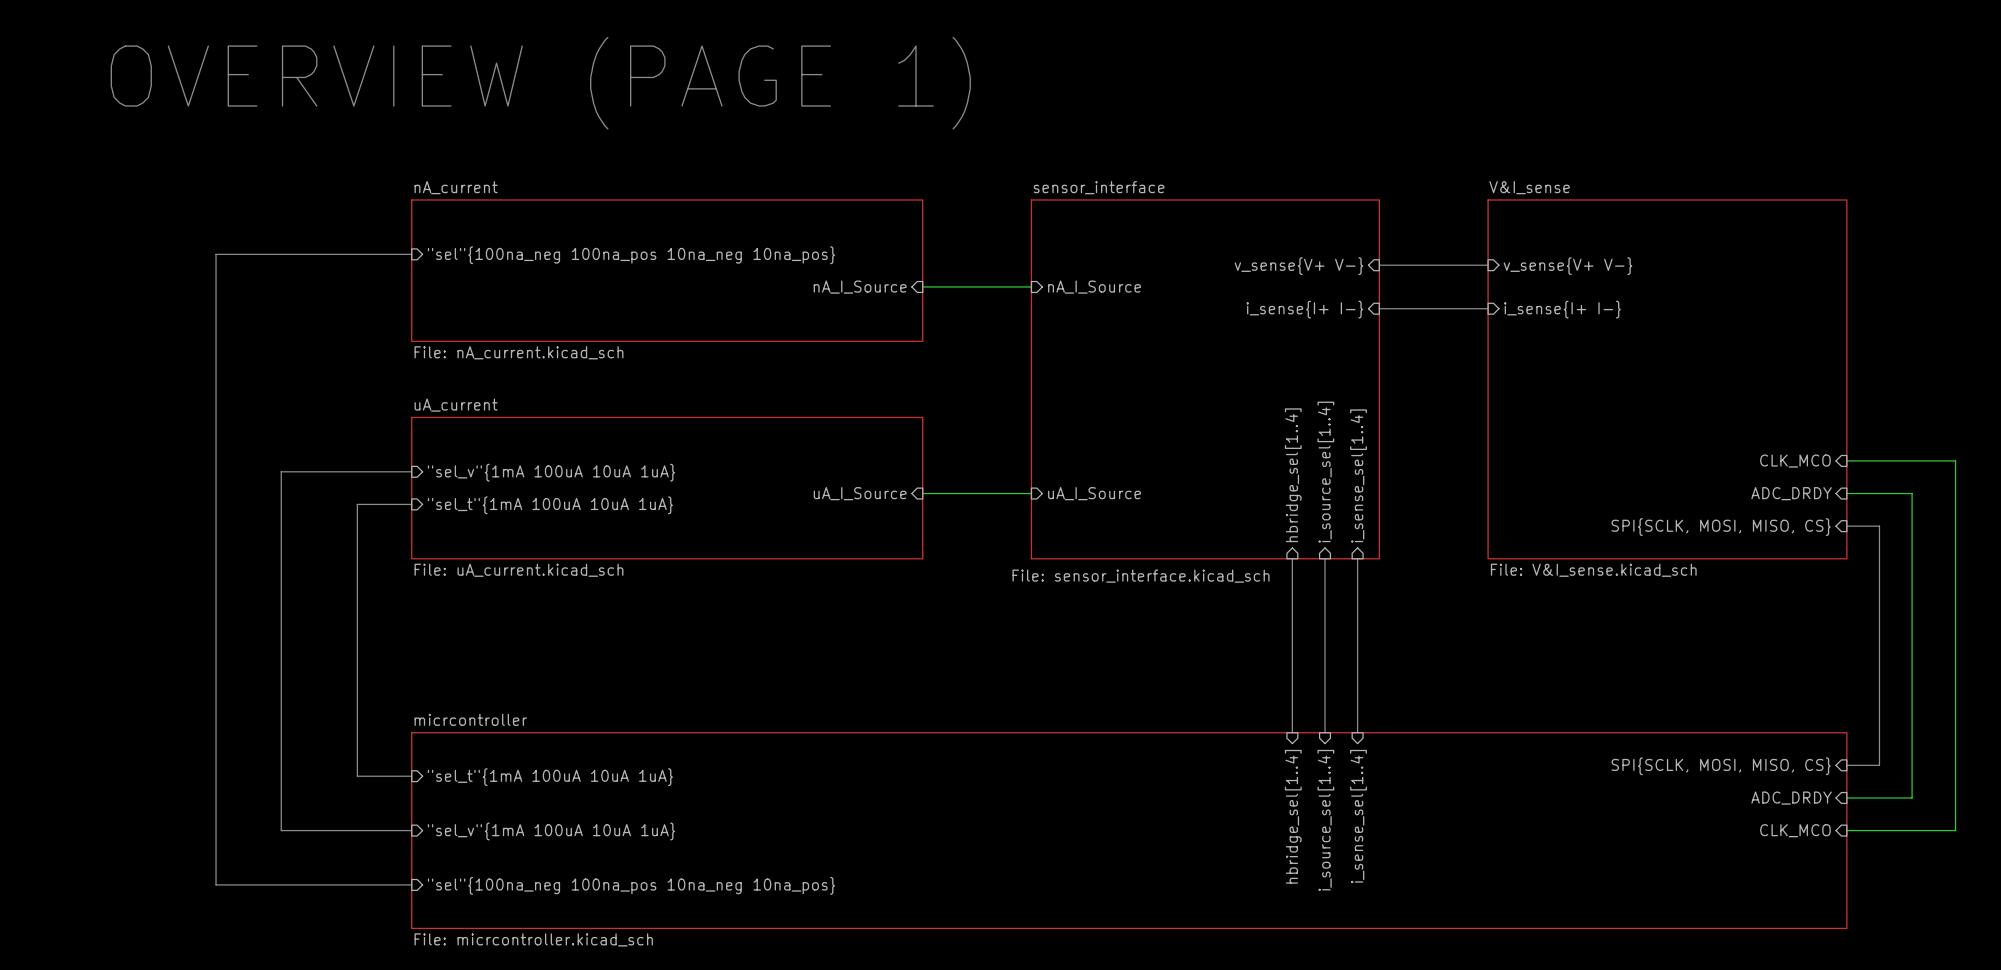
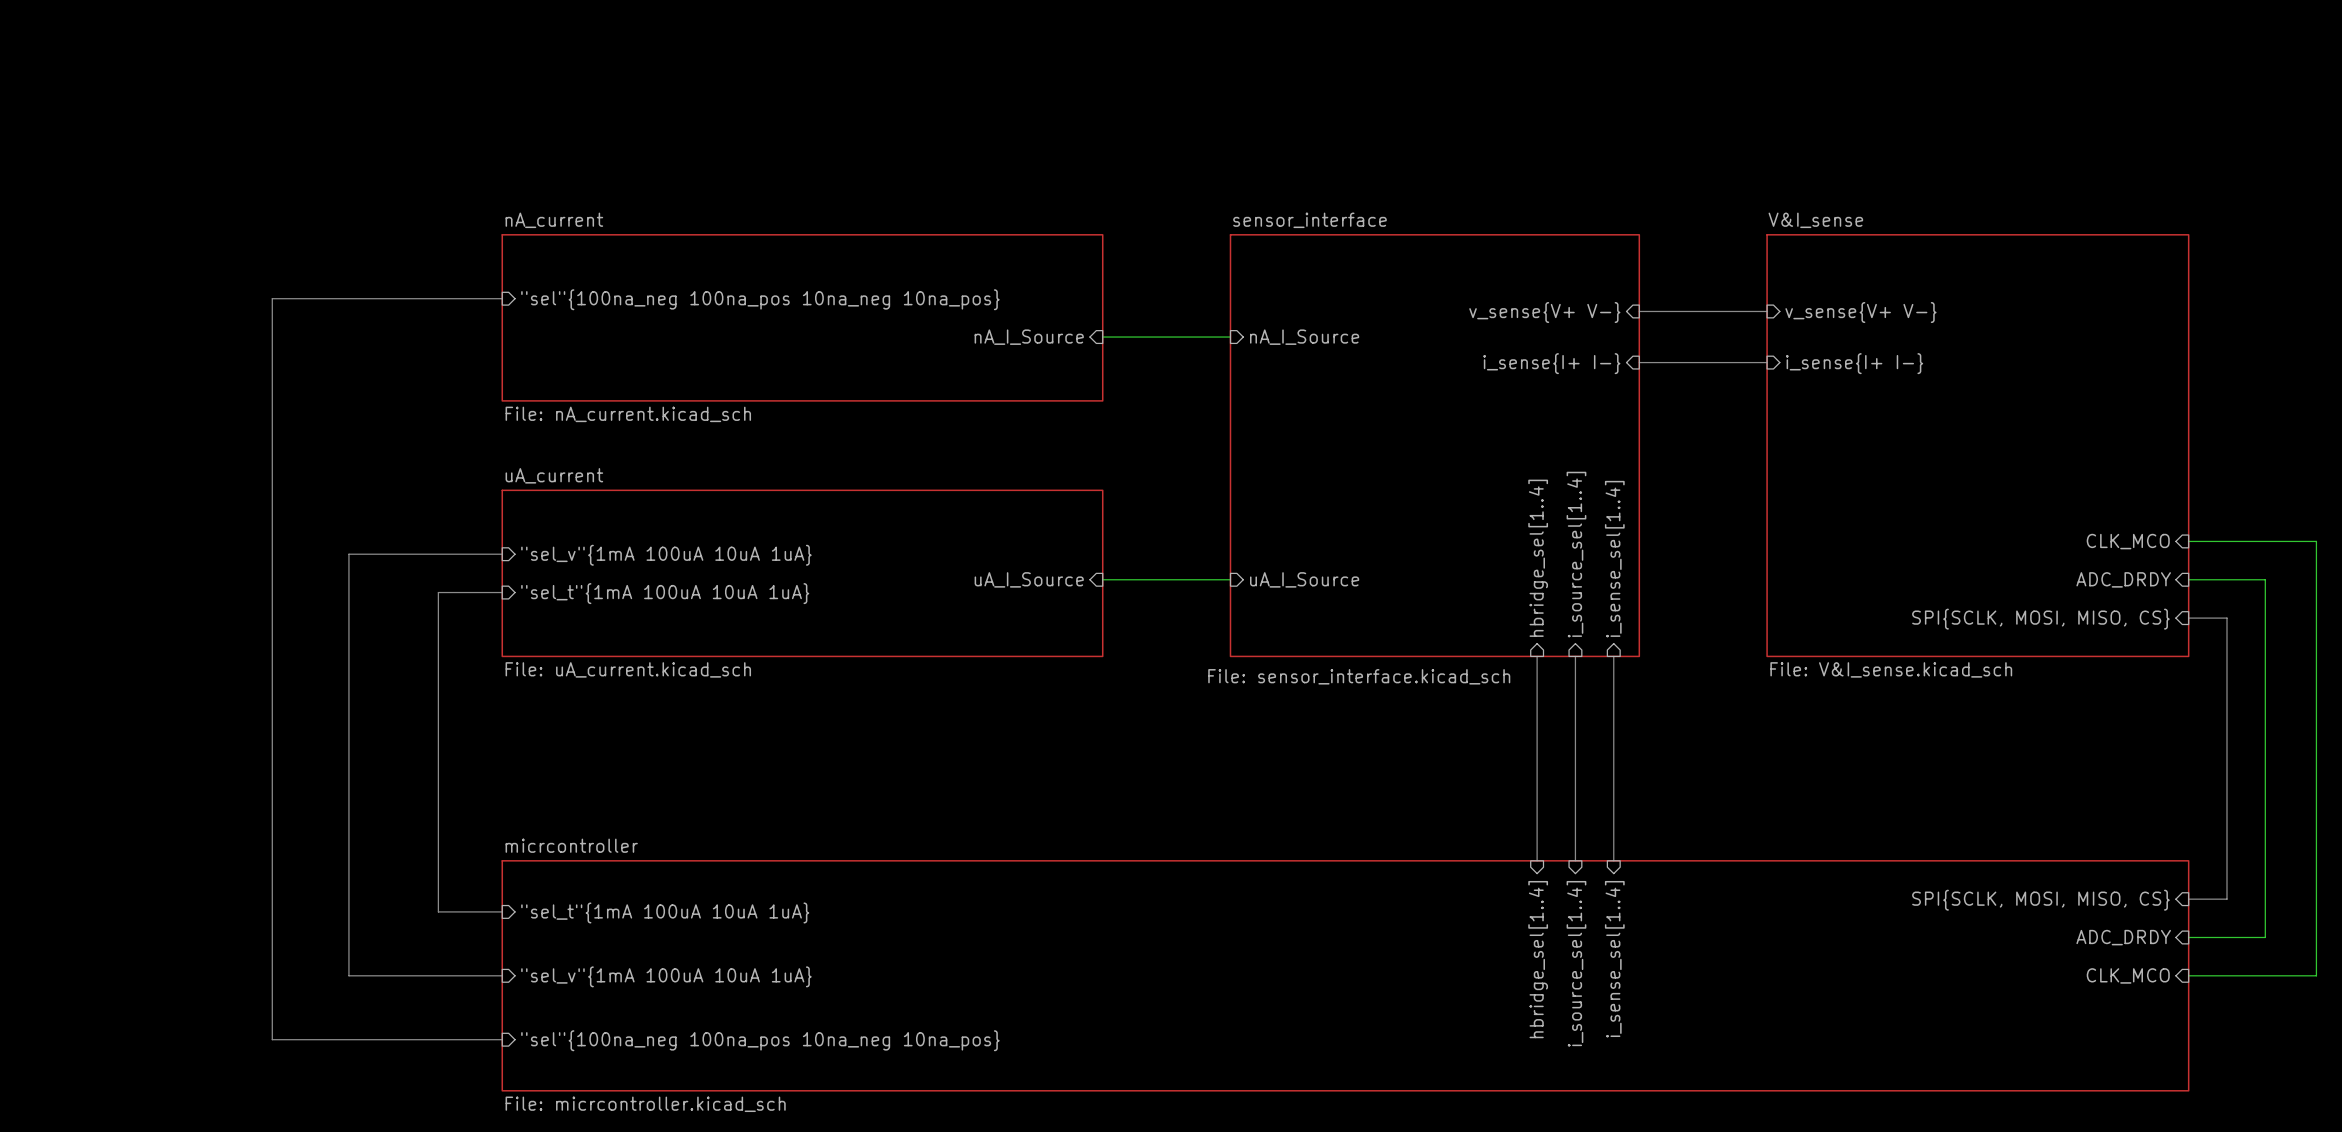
text: OVERVIEW (PAGE 1) (540, 83) -> none

